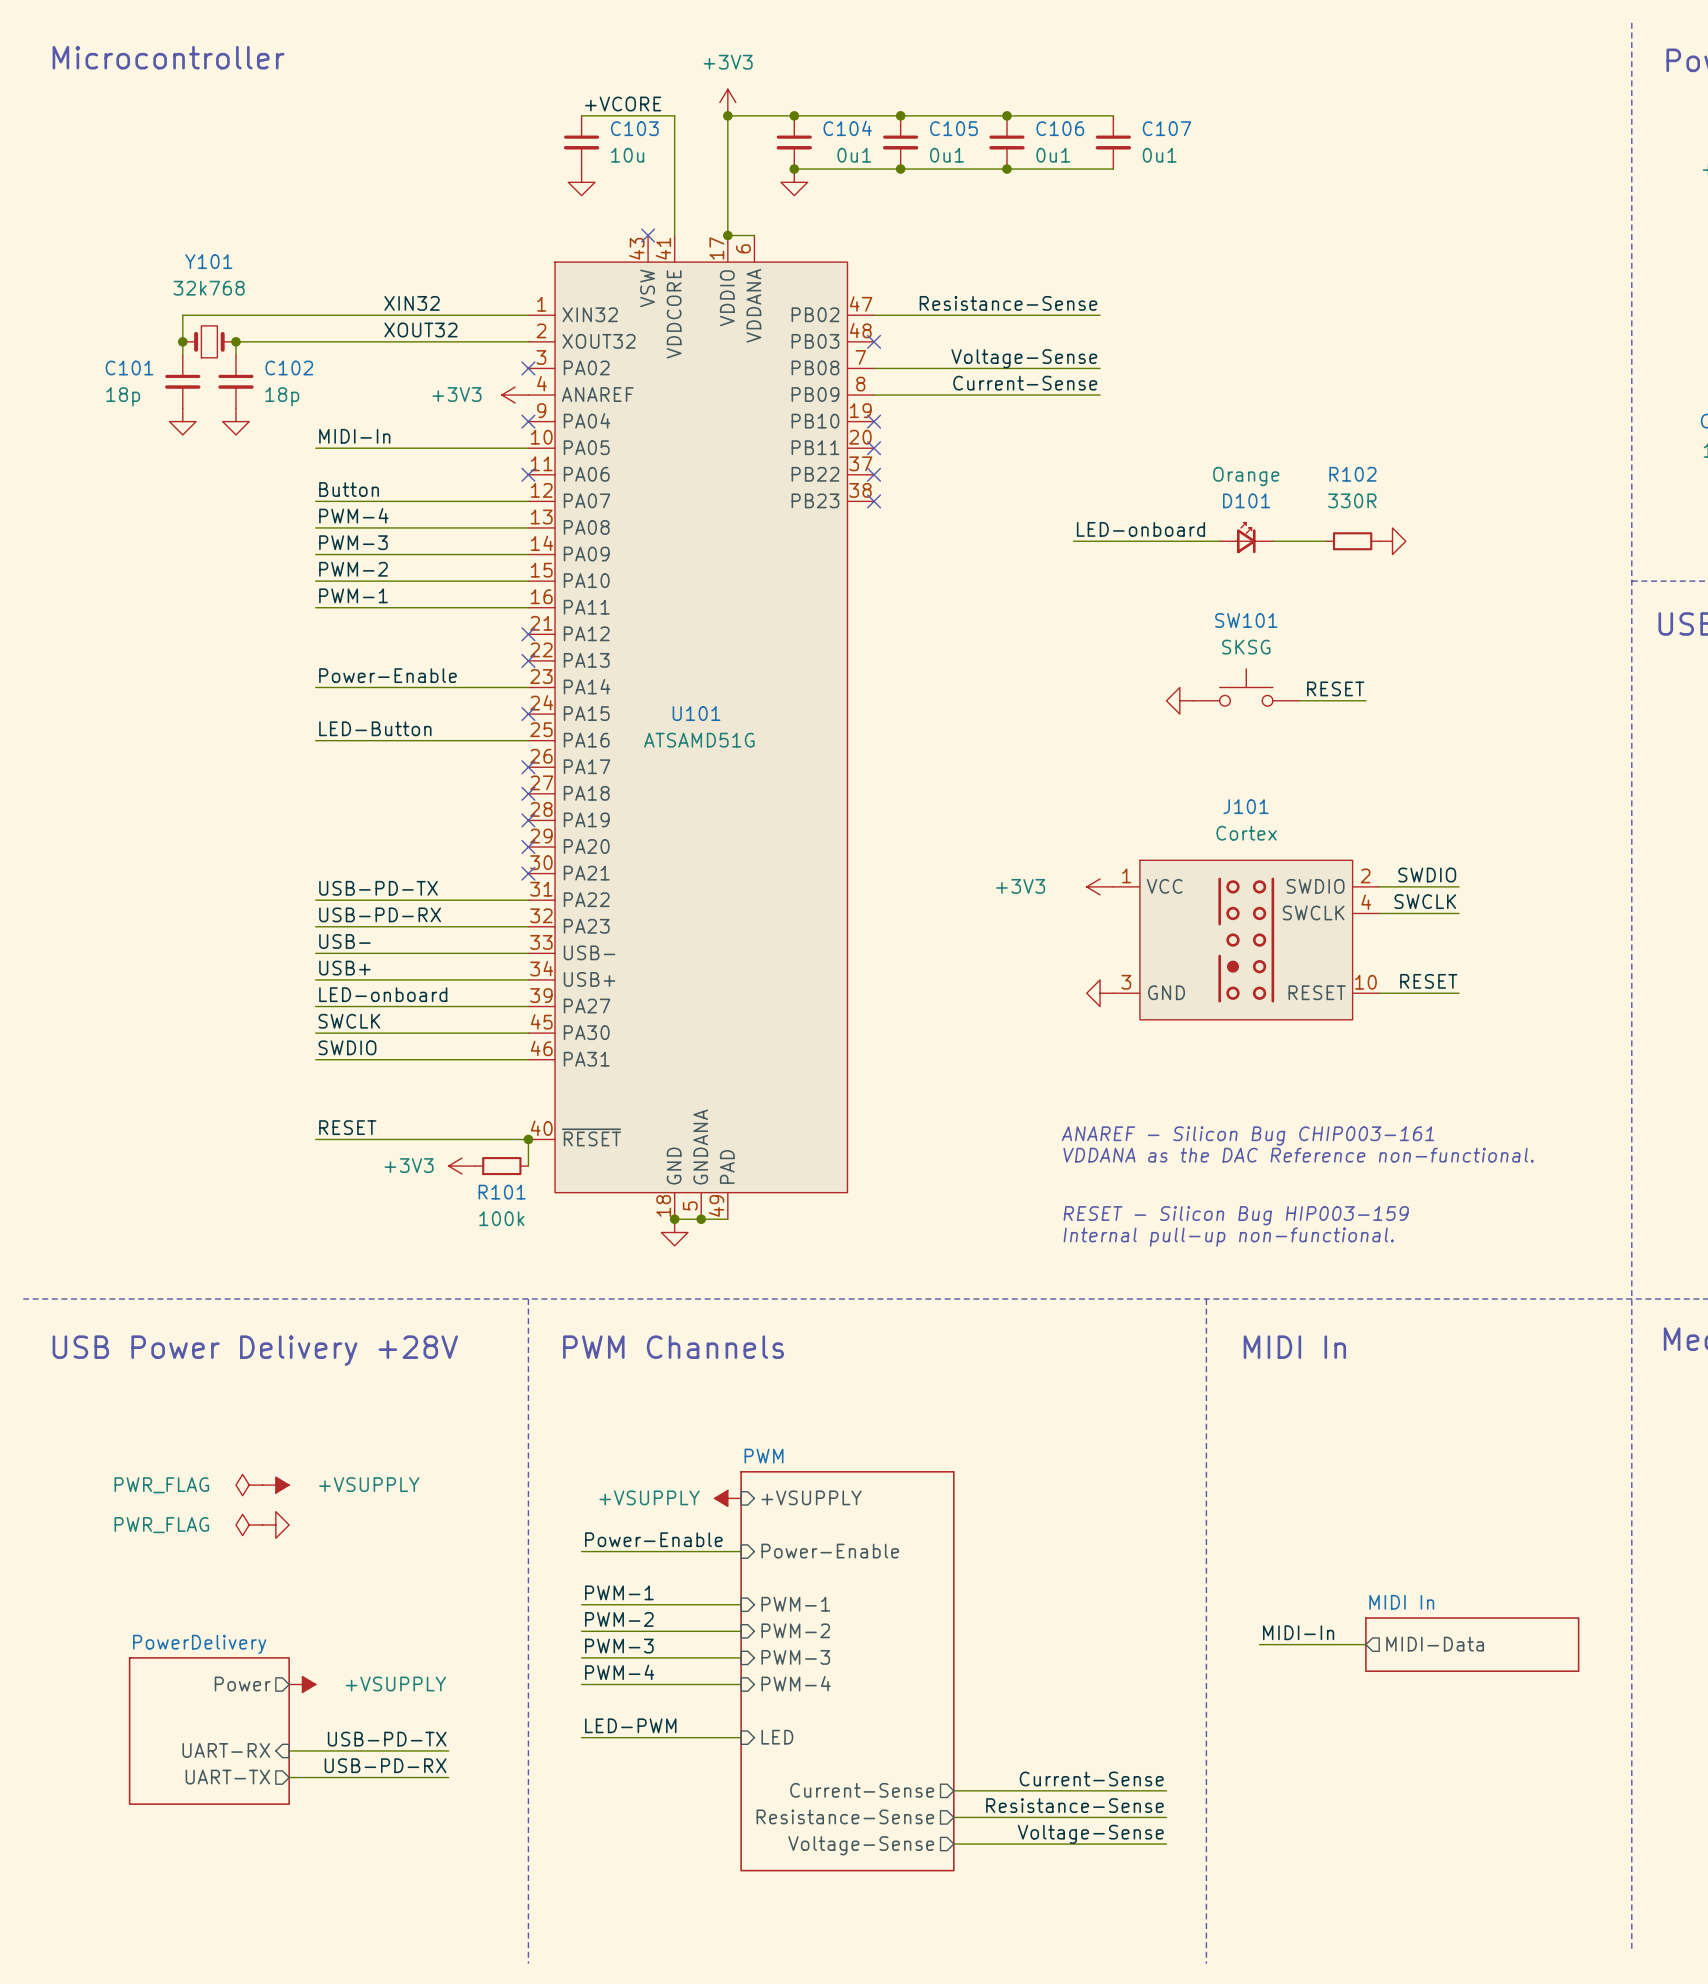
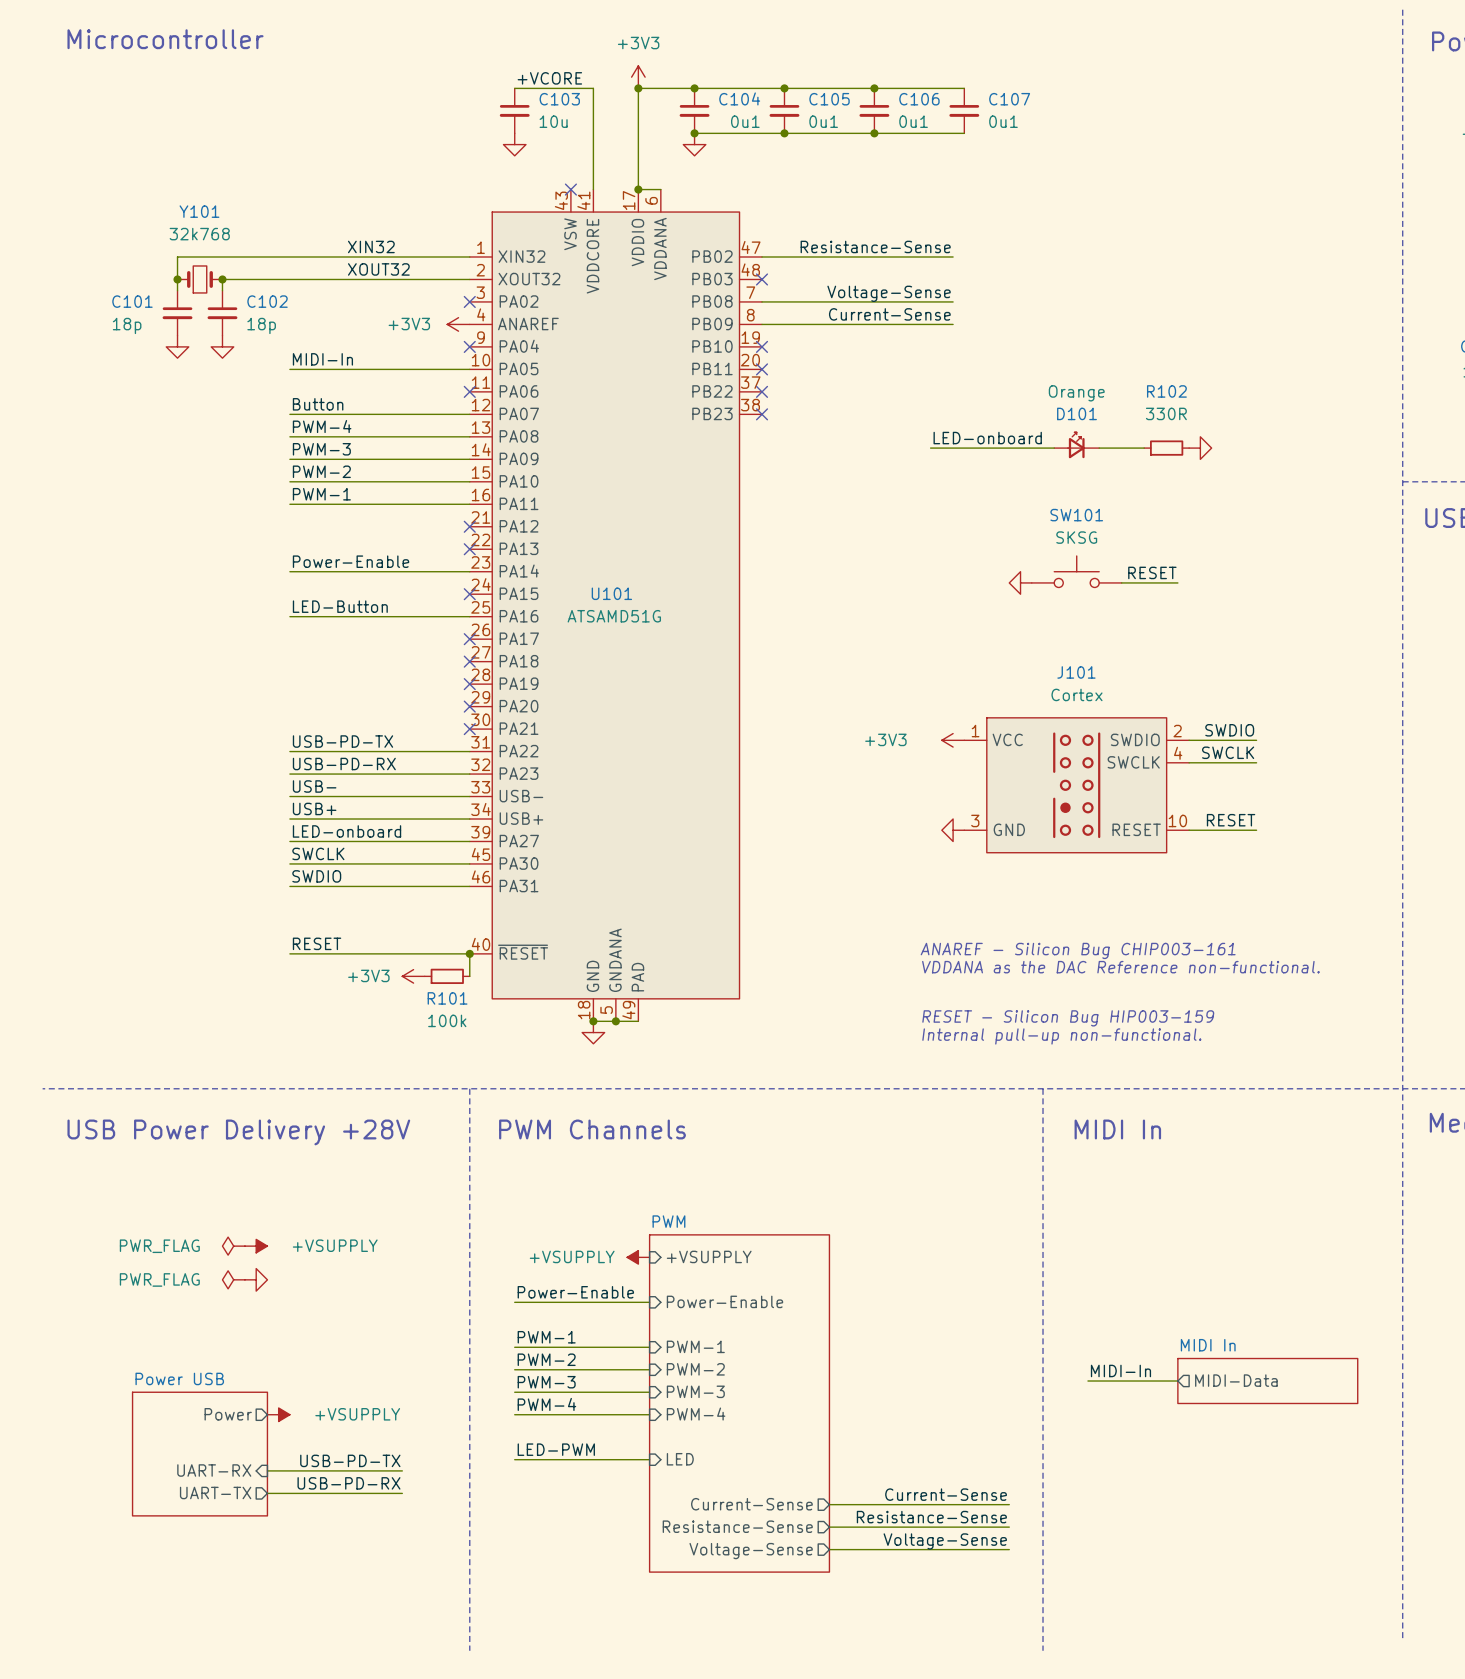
sheet PowerDelivery name: PowerDelivery (199, 1644) -> Power USB (179, 1378)

